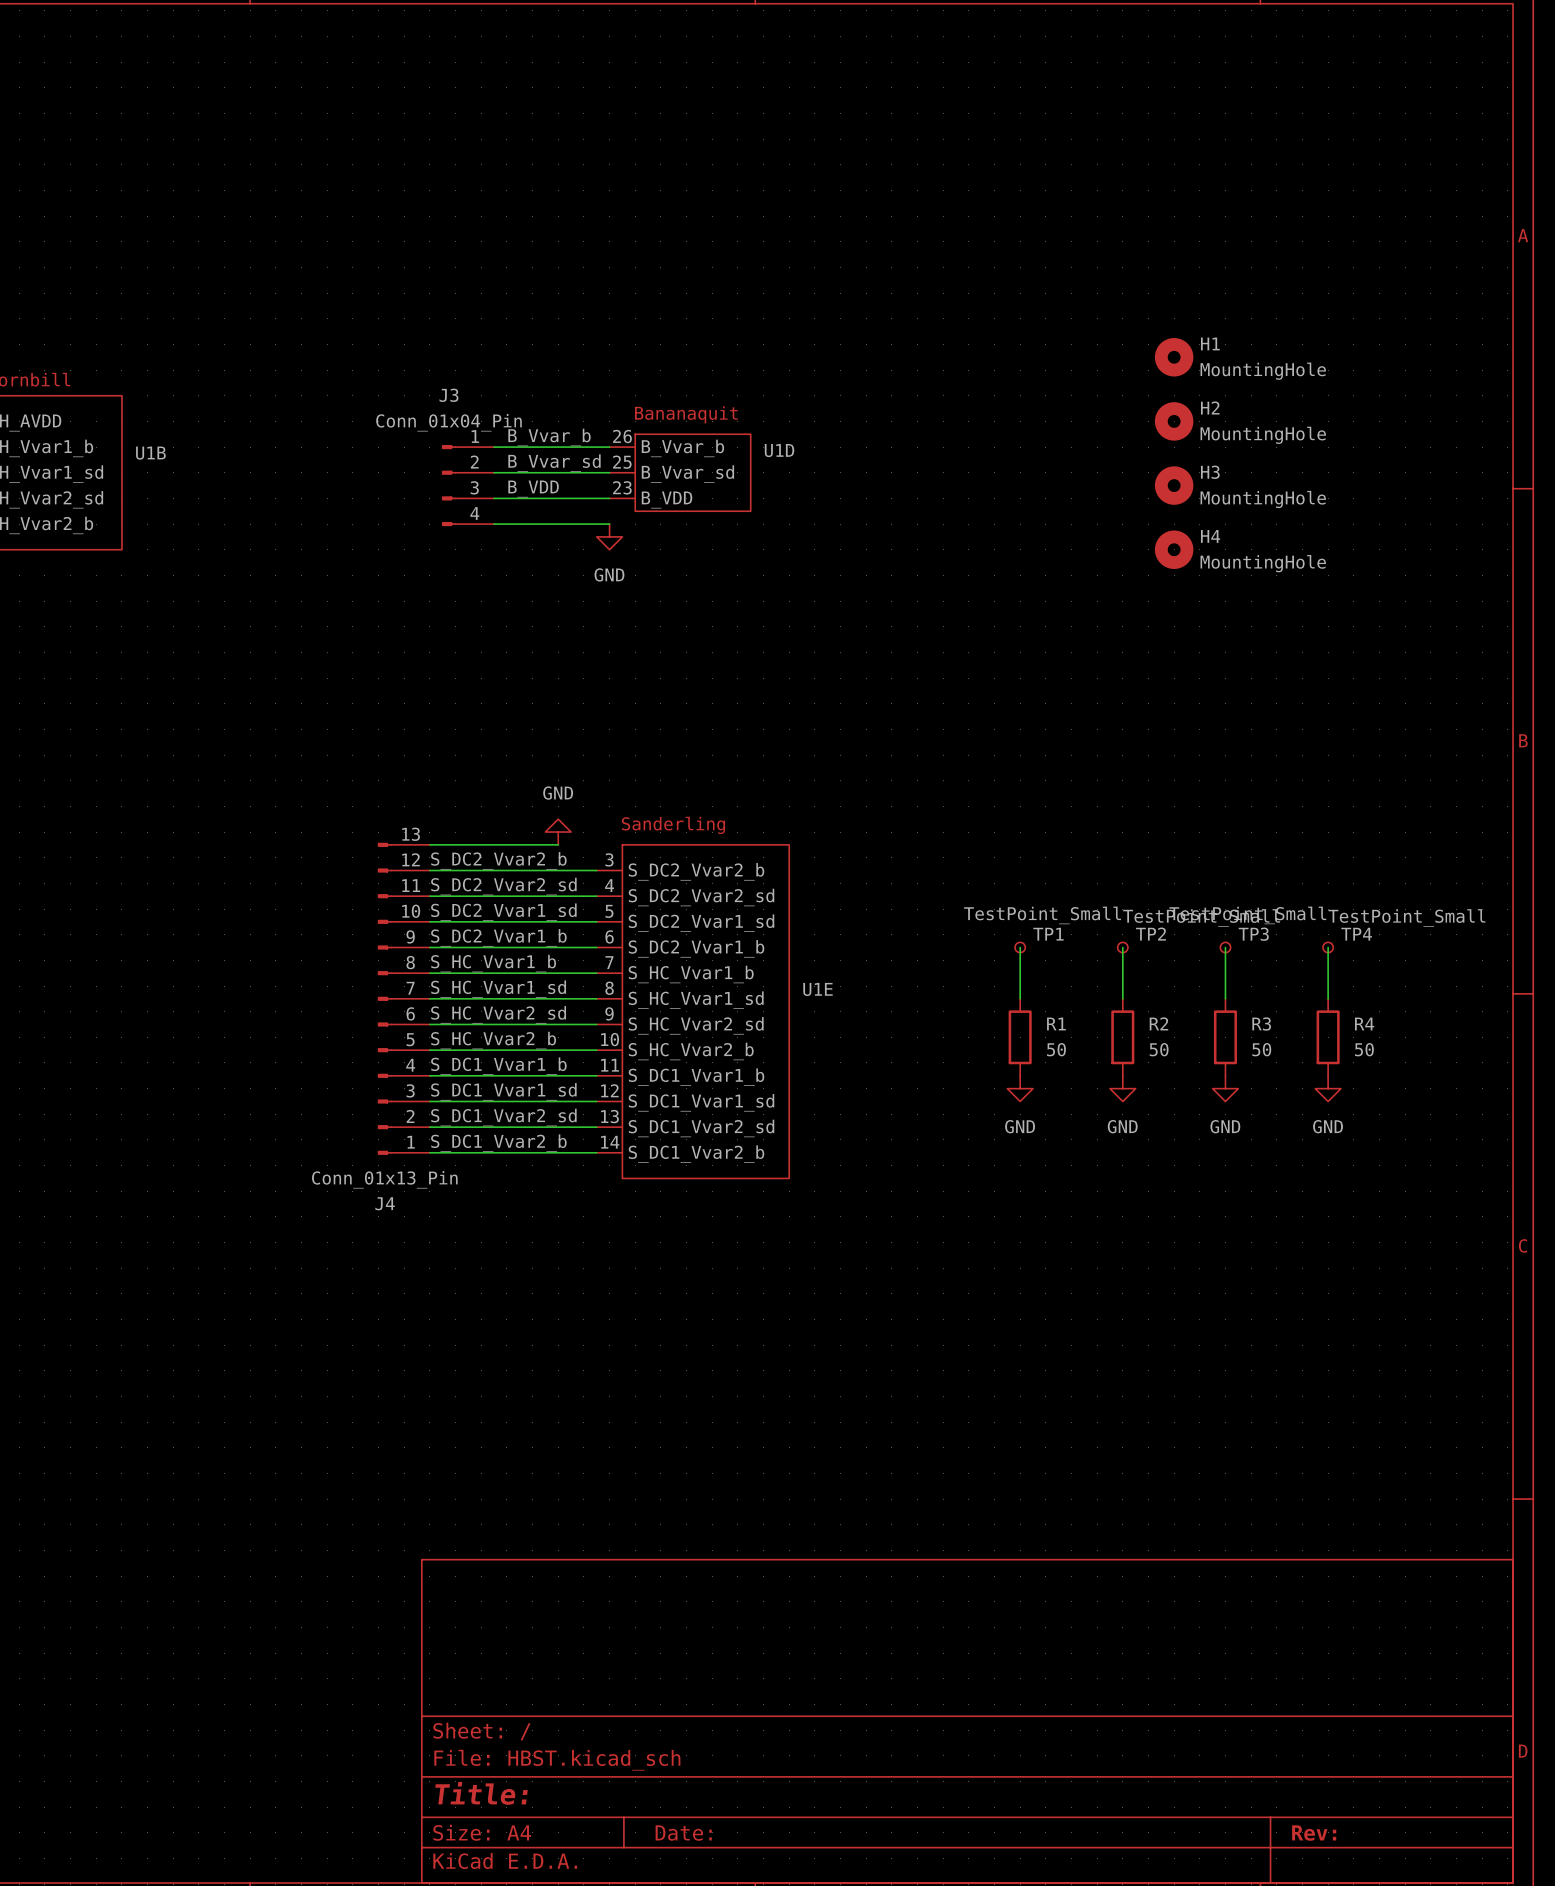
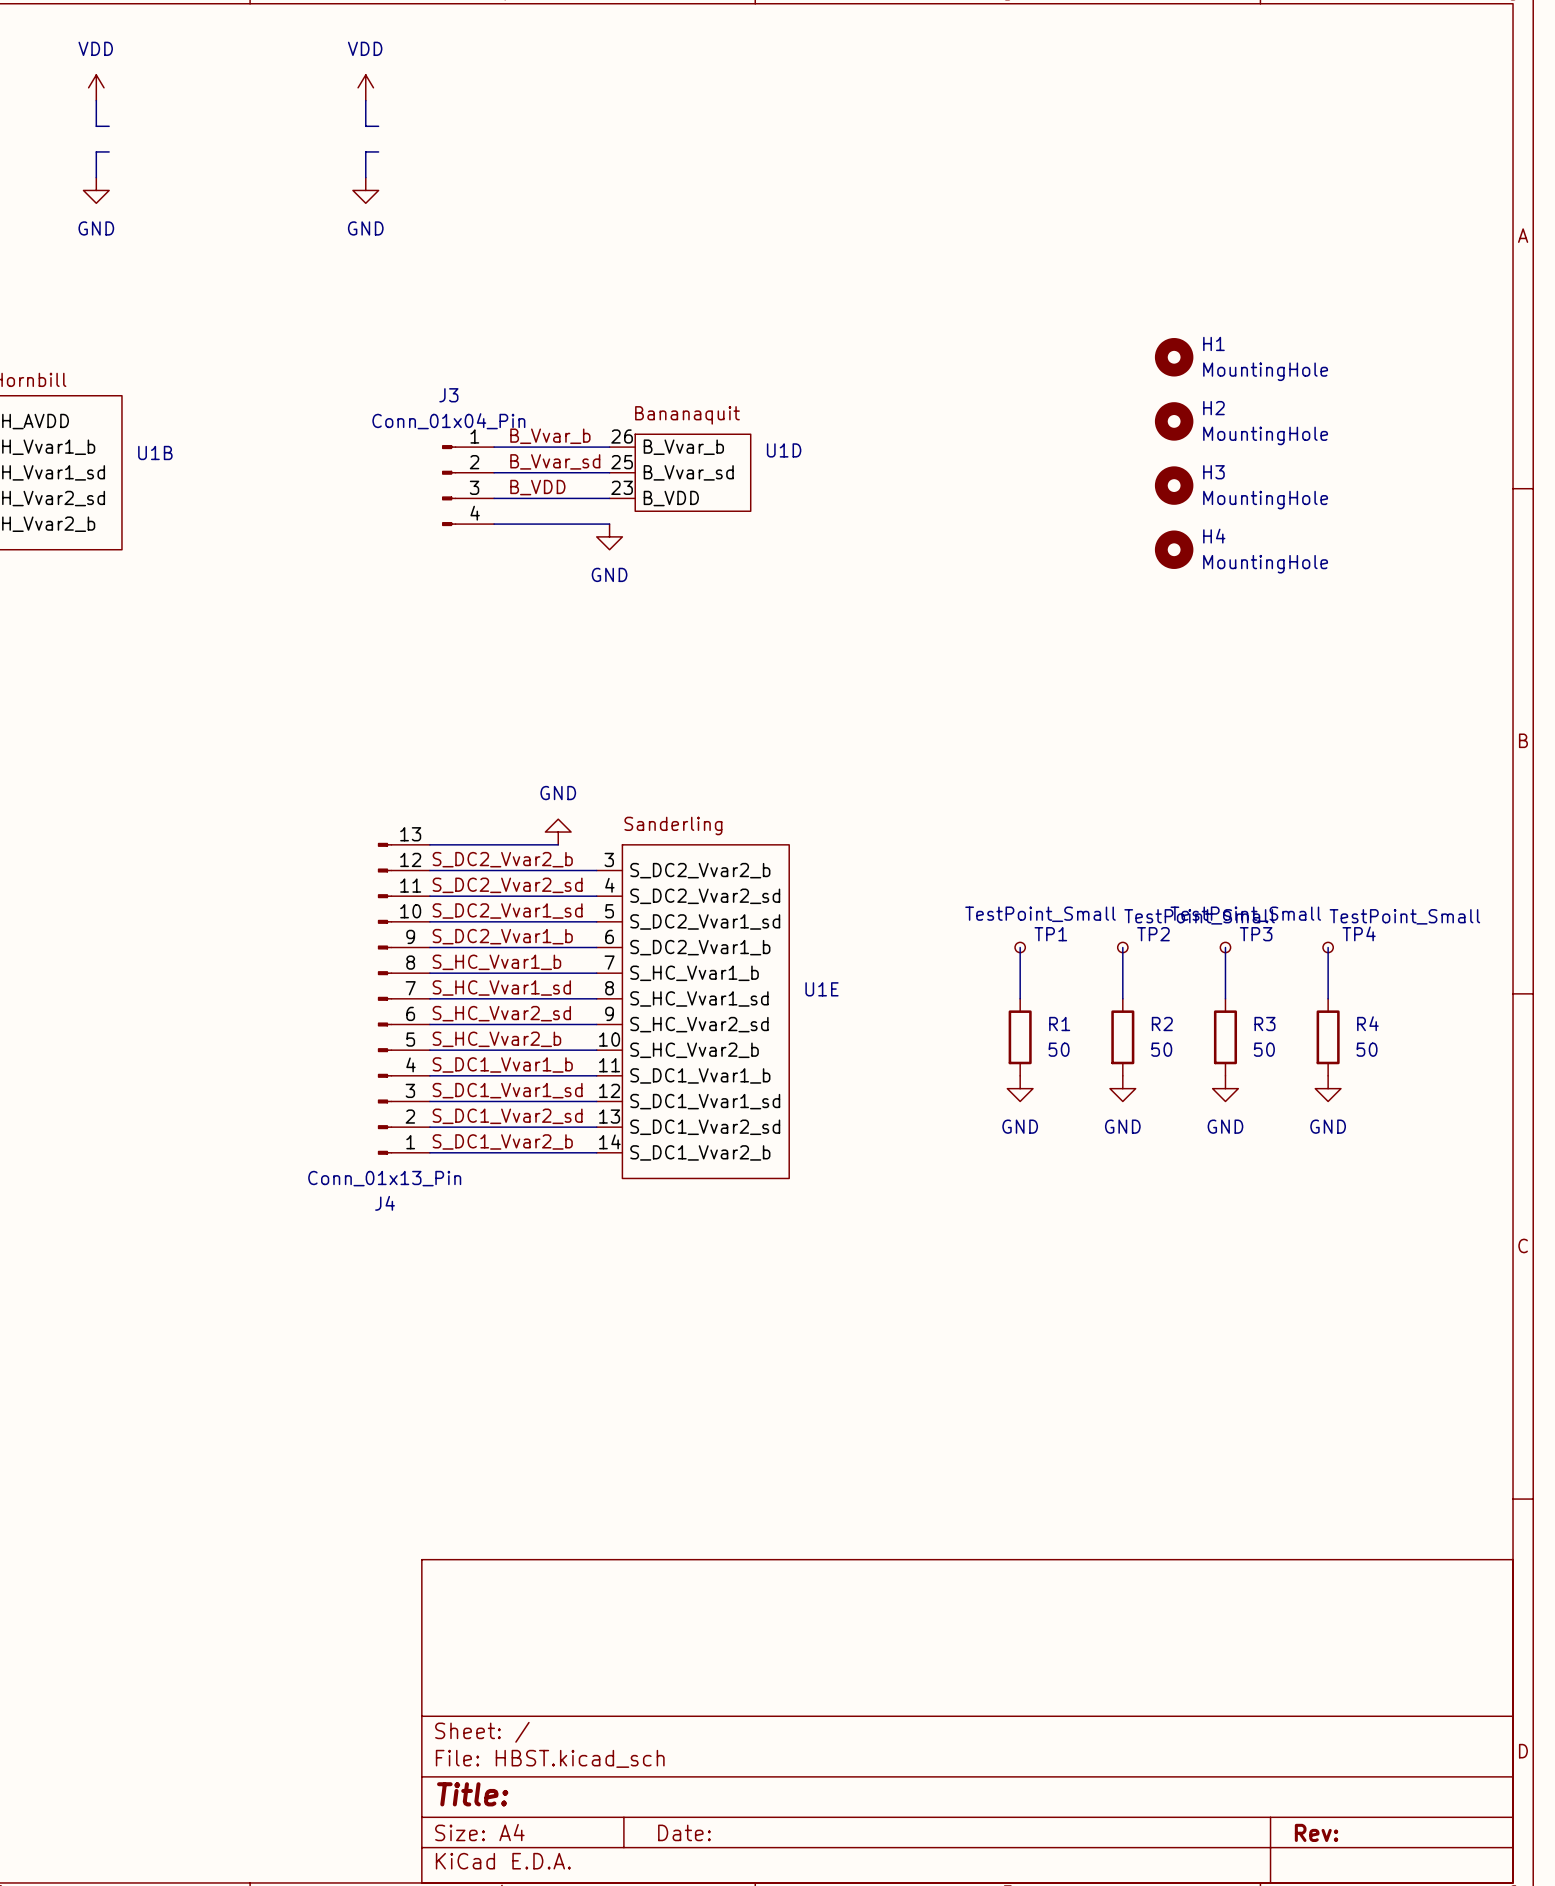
power symbol: none -> VDD (96, 87)
power symbol: none -> VDD (365, 87)
wire: none -> (96, 100) (96, 126) (109, 126)
wire: none -> (365, 100) (365, 126) (378, 126)
wire: none -> (109, 151) (96, 151) (96, 177)
wire: none -> (378, 151) (365, 151) (365, 177)
power symbol: none -> GND (96, 190)
power symbol: none -> GND (365, 190)

